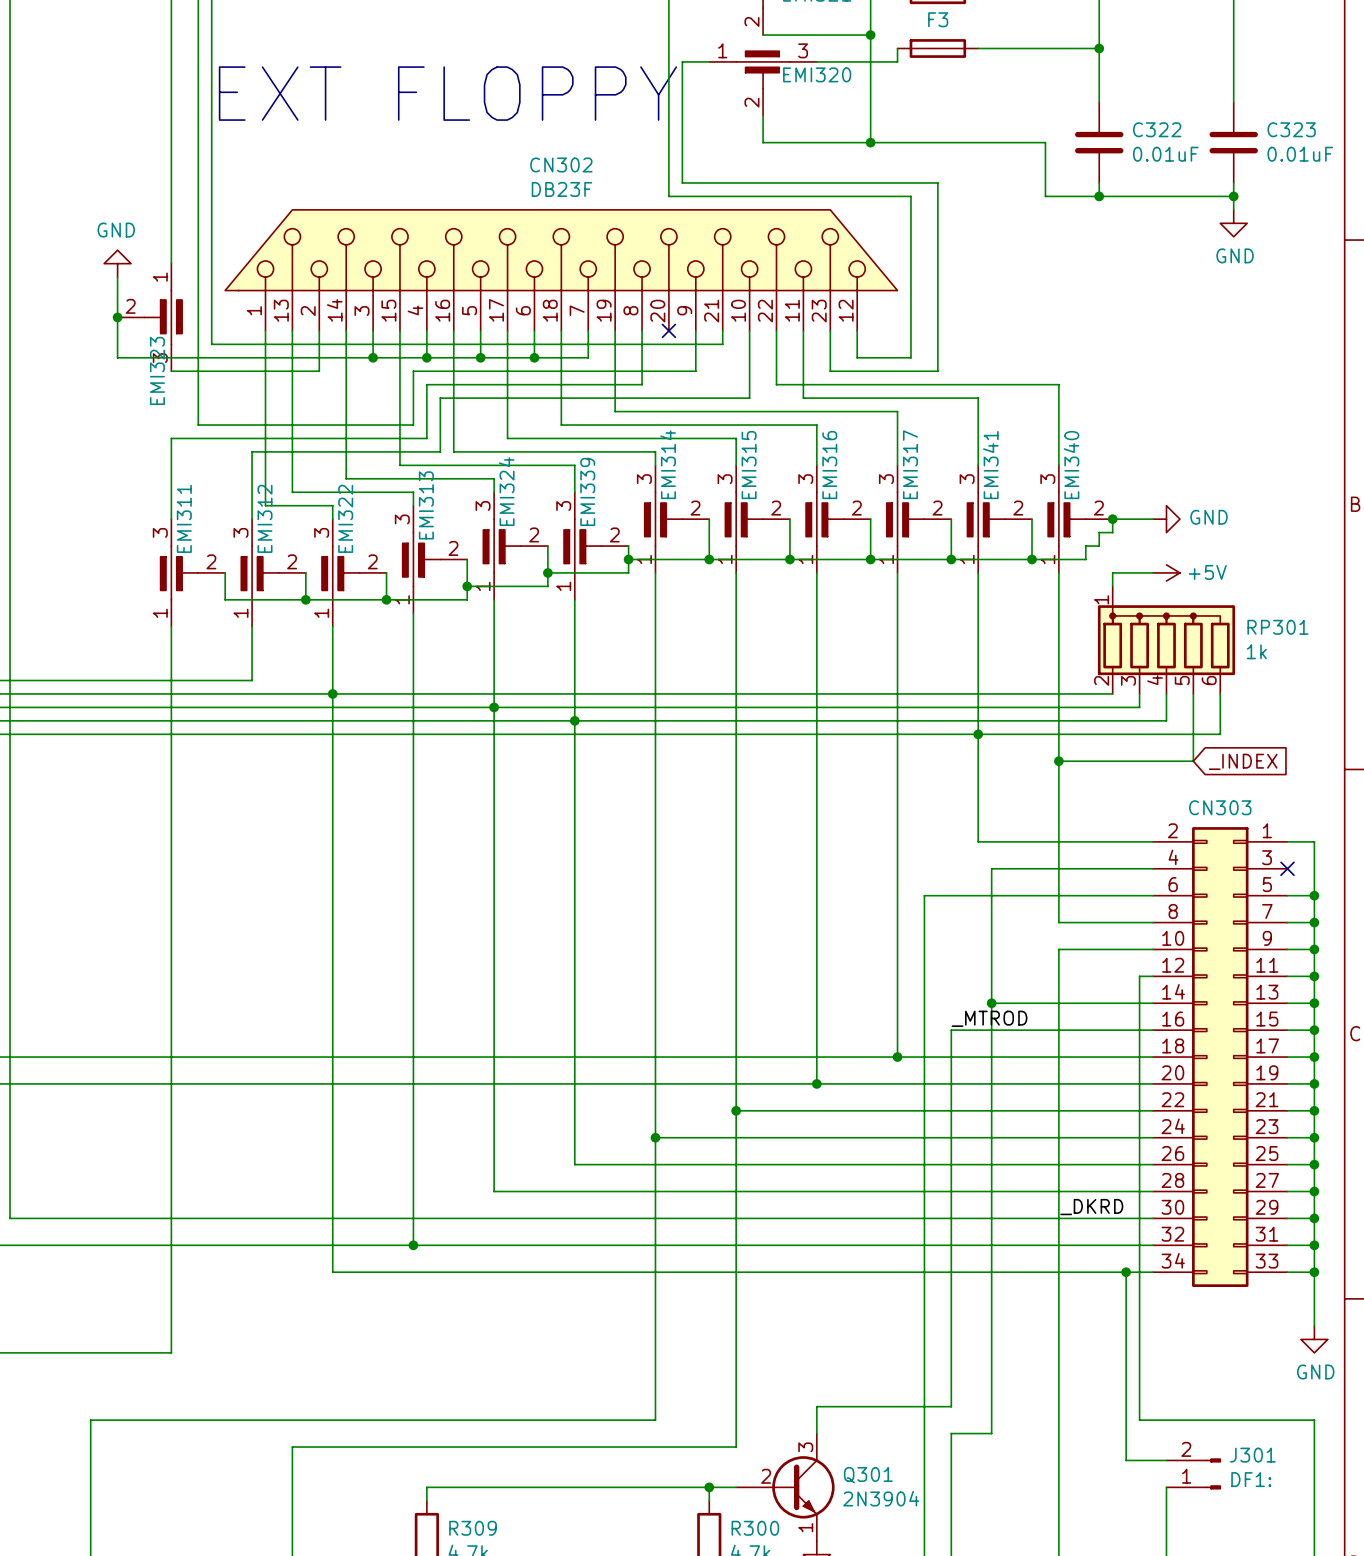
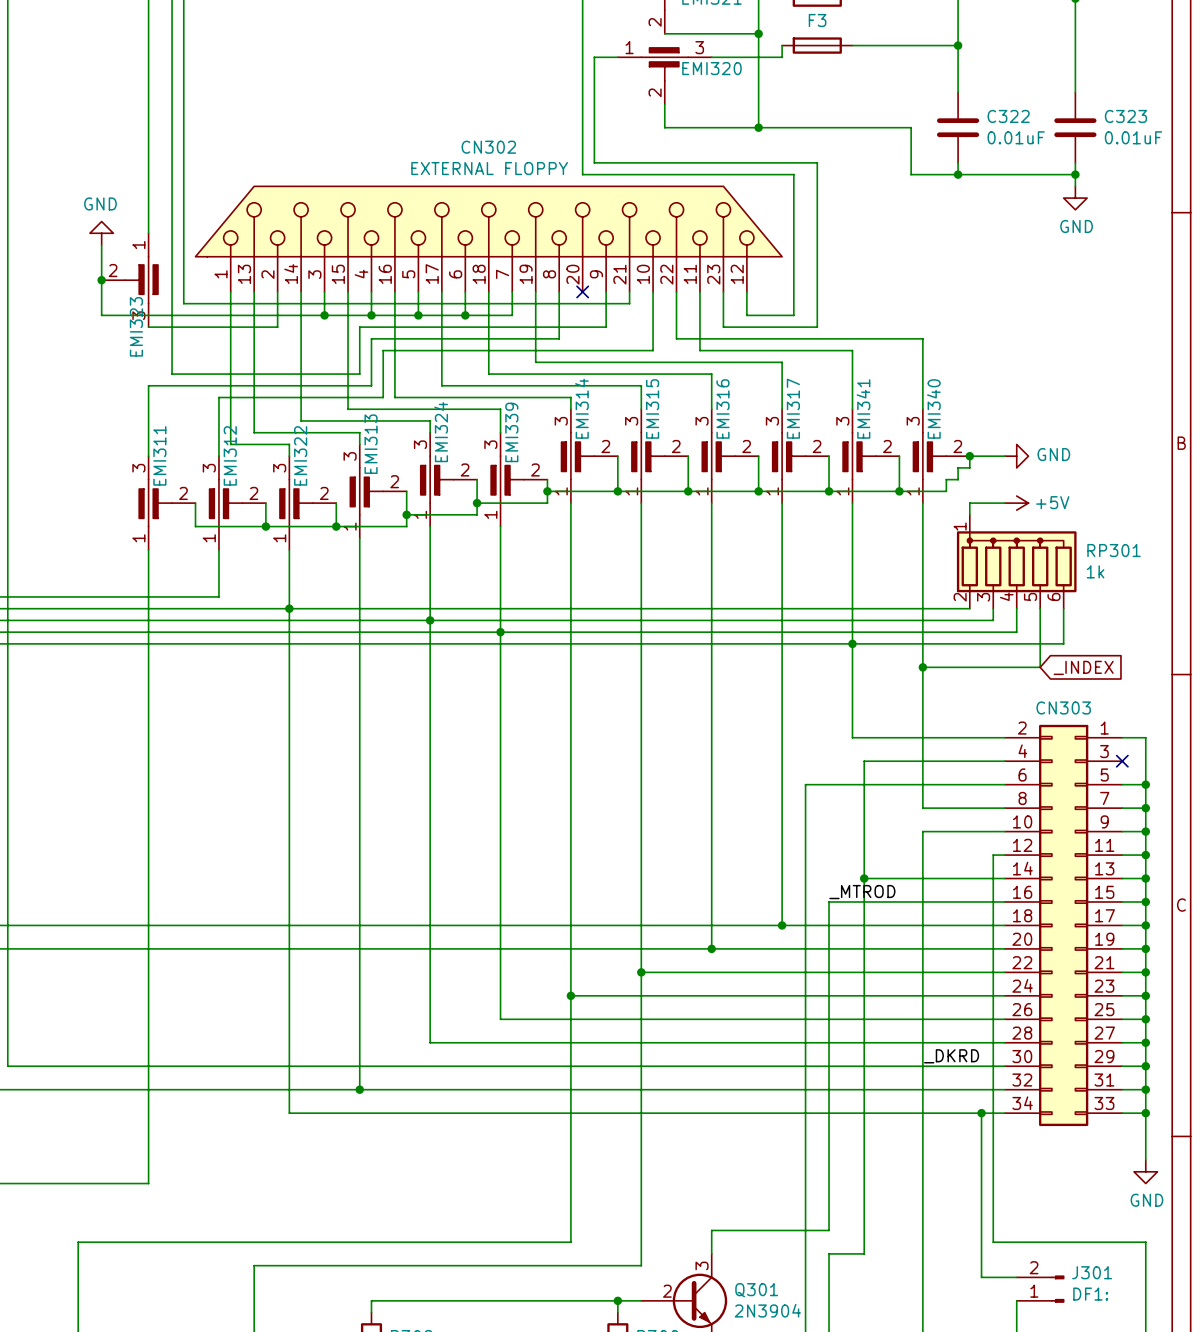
text: EXT FLOPPY (447, 93) -> none
CN302 value: DB23F (561, 189) -> EXTERNAL FLOPPY (489, 168)

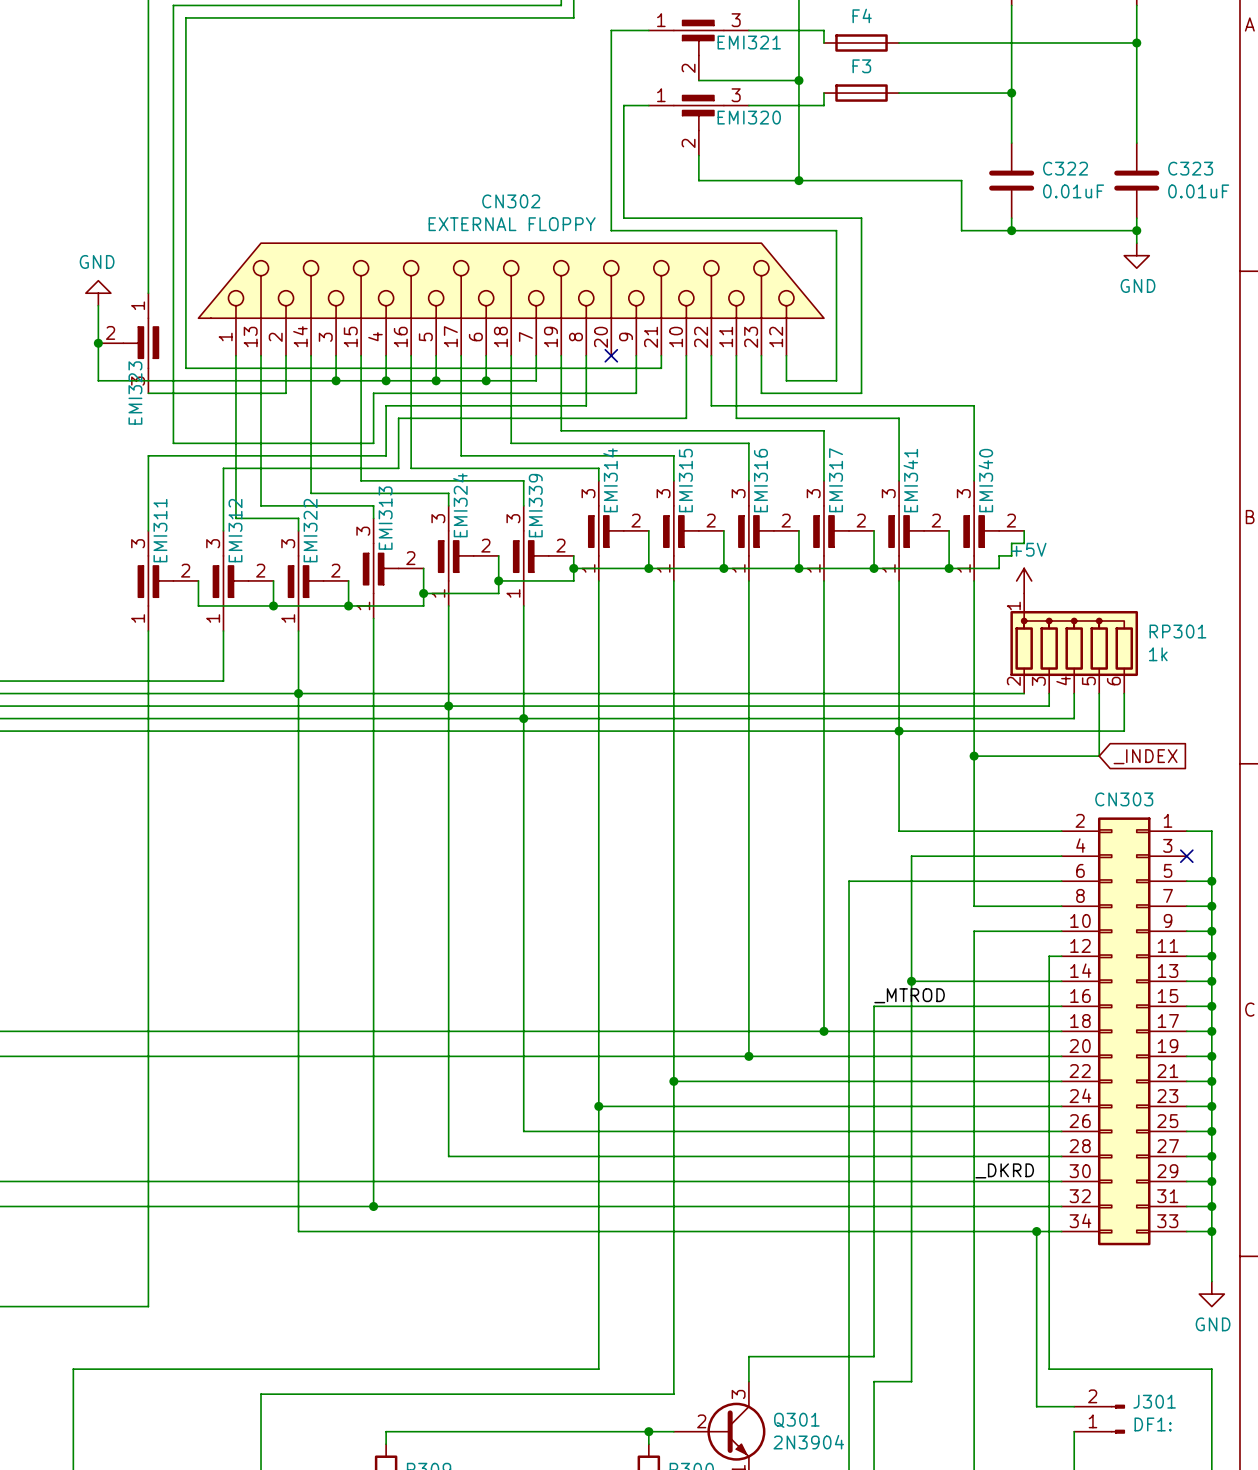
wire: (969, 456) (1004, 456) -> none
junction: (969, 456) -> none
power symbol: GND (1016, 456) -> none
wire: (1004, 503) (969, 503) (969, 514) -> none
power symbol rotation: 0° (1016, 503) -> 90° counterclockwise (1024, 580)
power symbol position: +5V (1016, 503) -> +5V (1024, 580)

